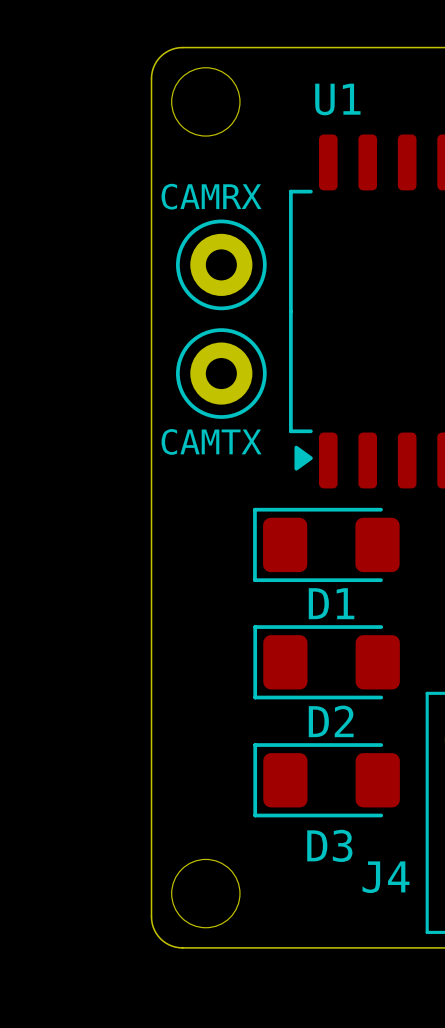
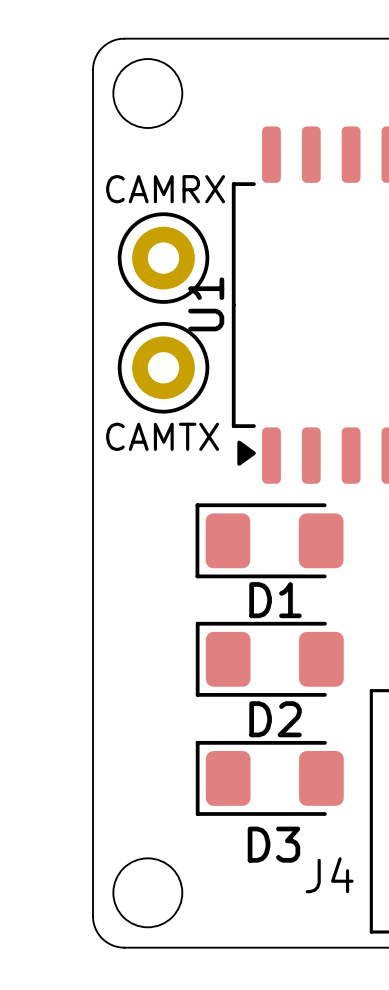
U1 name rotation: 0° (337, 99) -> 90° counterclockwise (206, 304)
U1 name position: U1 (337, 99) -> U1 (206, 304)

